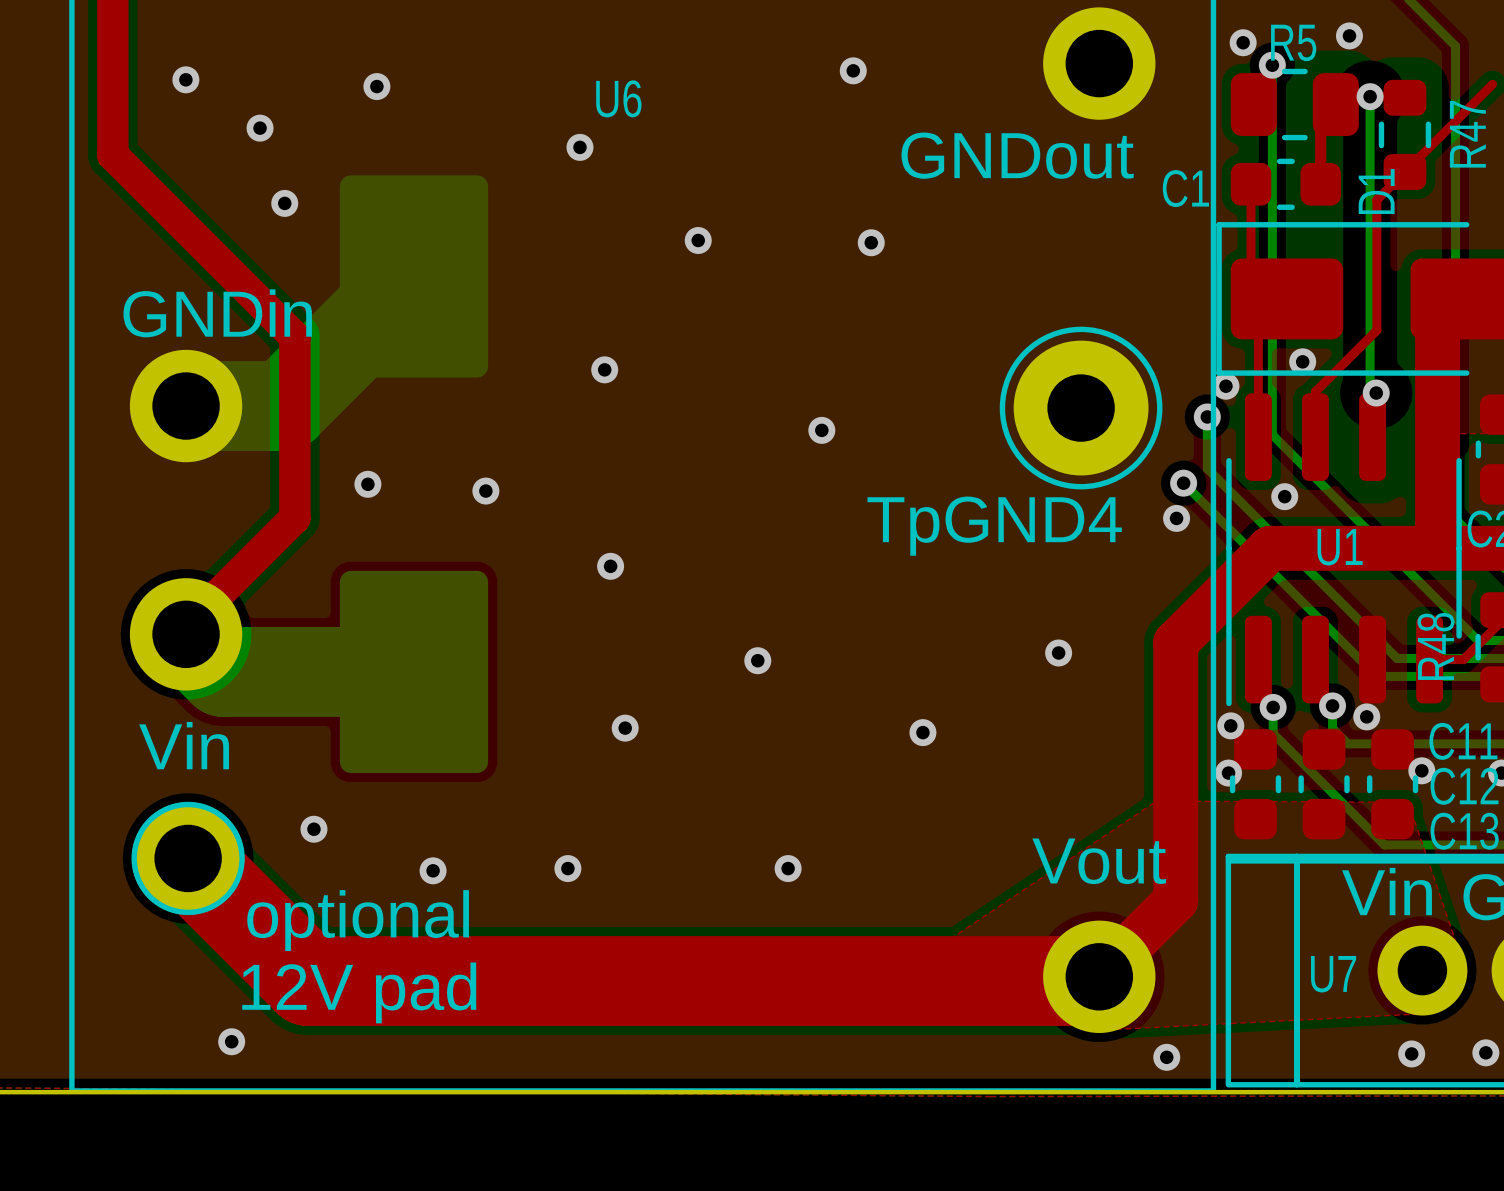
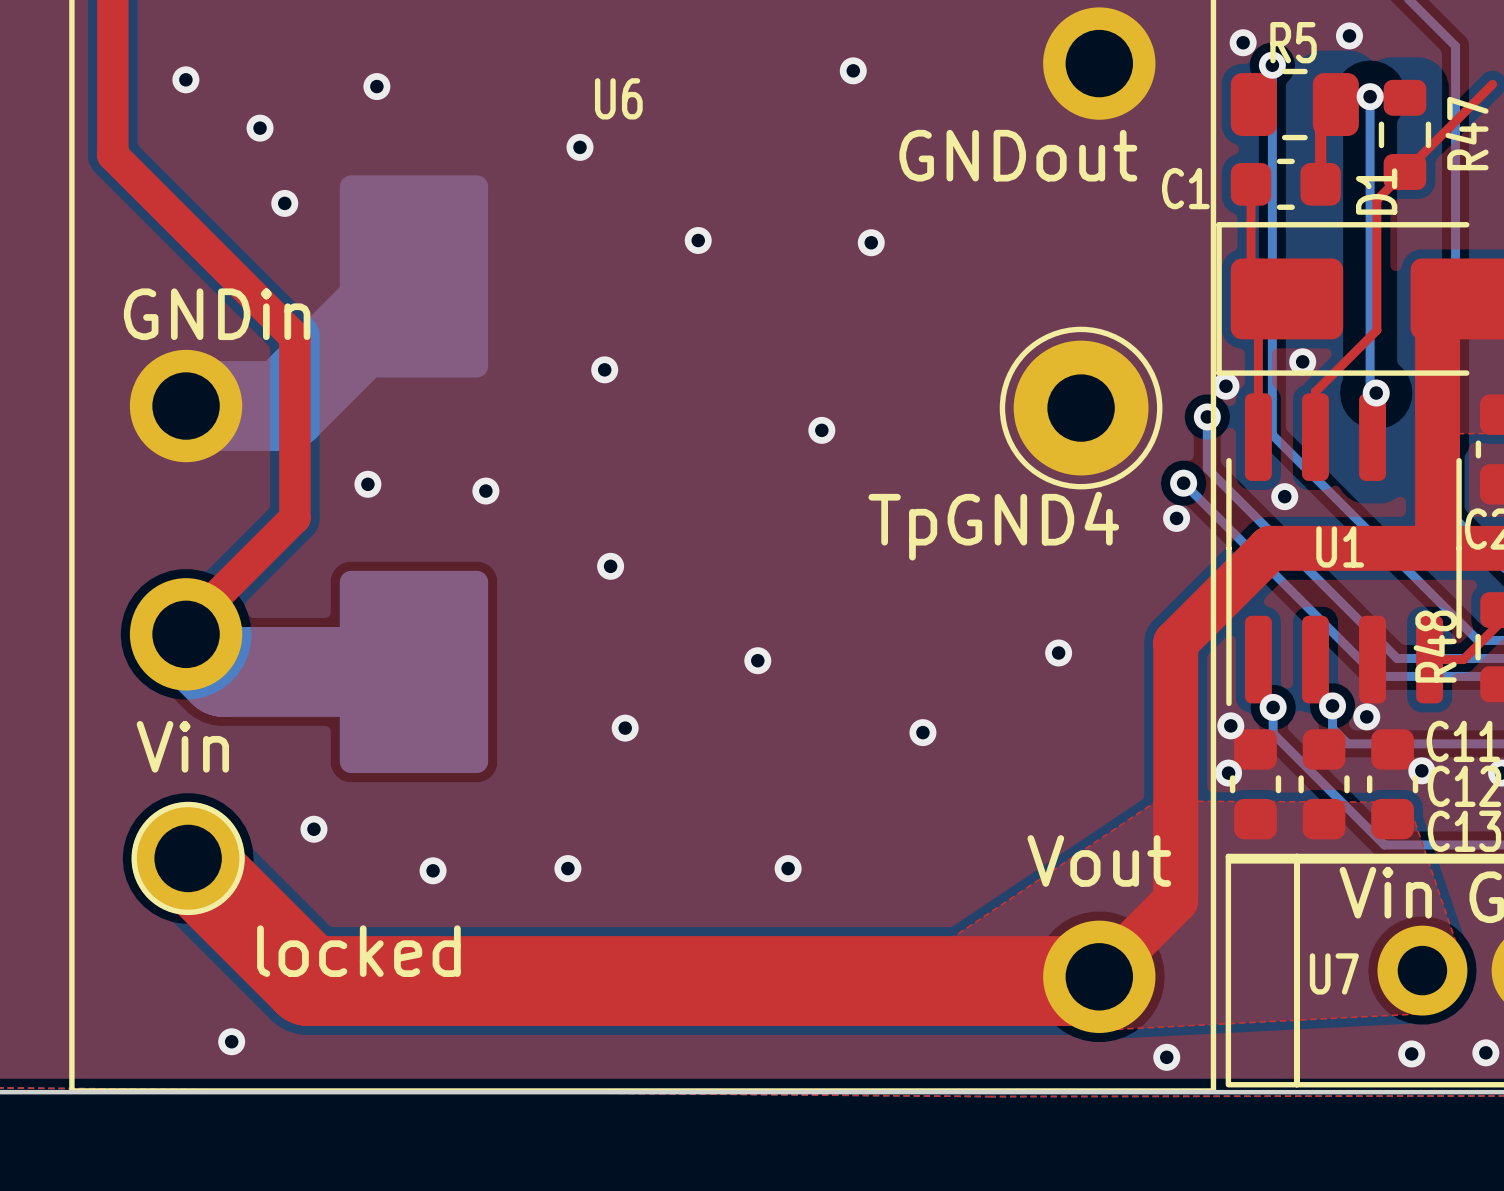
text: optional (358, 920) -> none
text: none -> locked (358, 951)
text: 12V pad (359, 992) -> none

